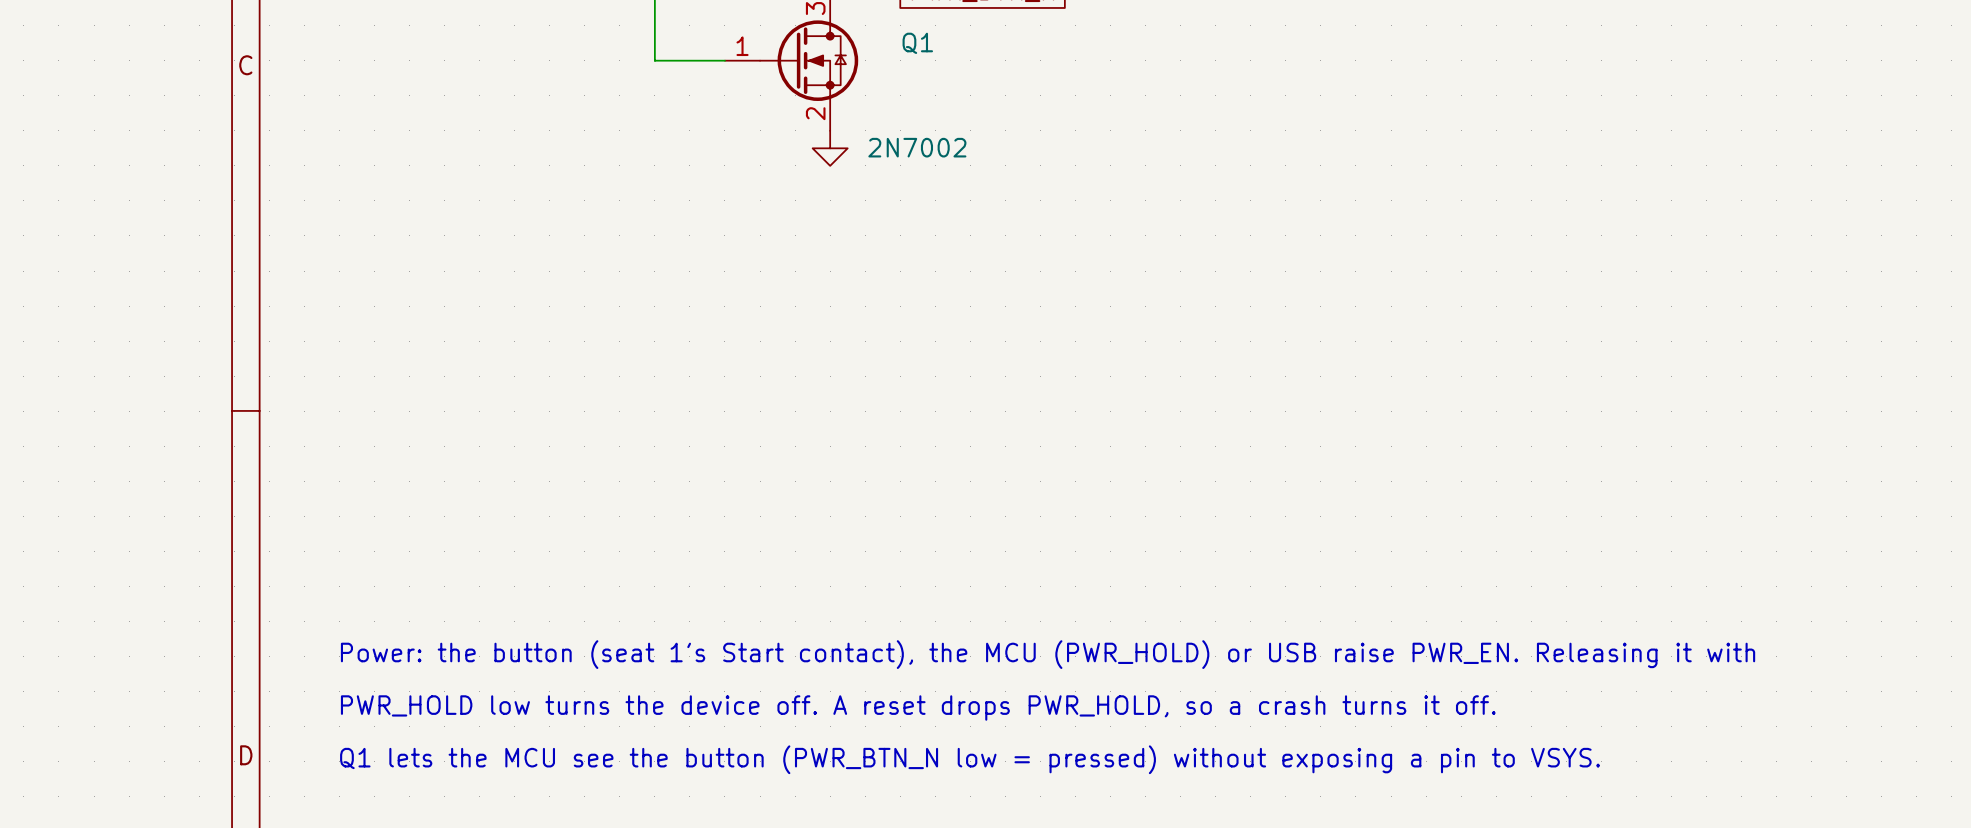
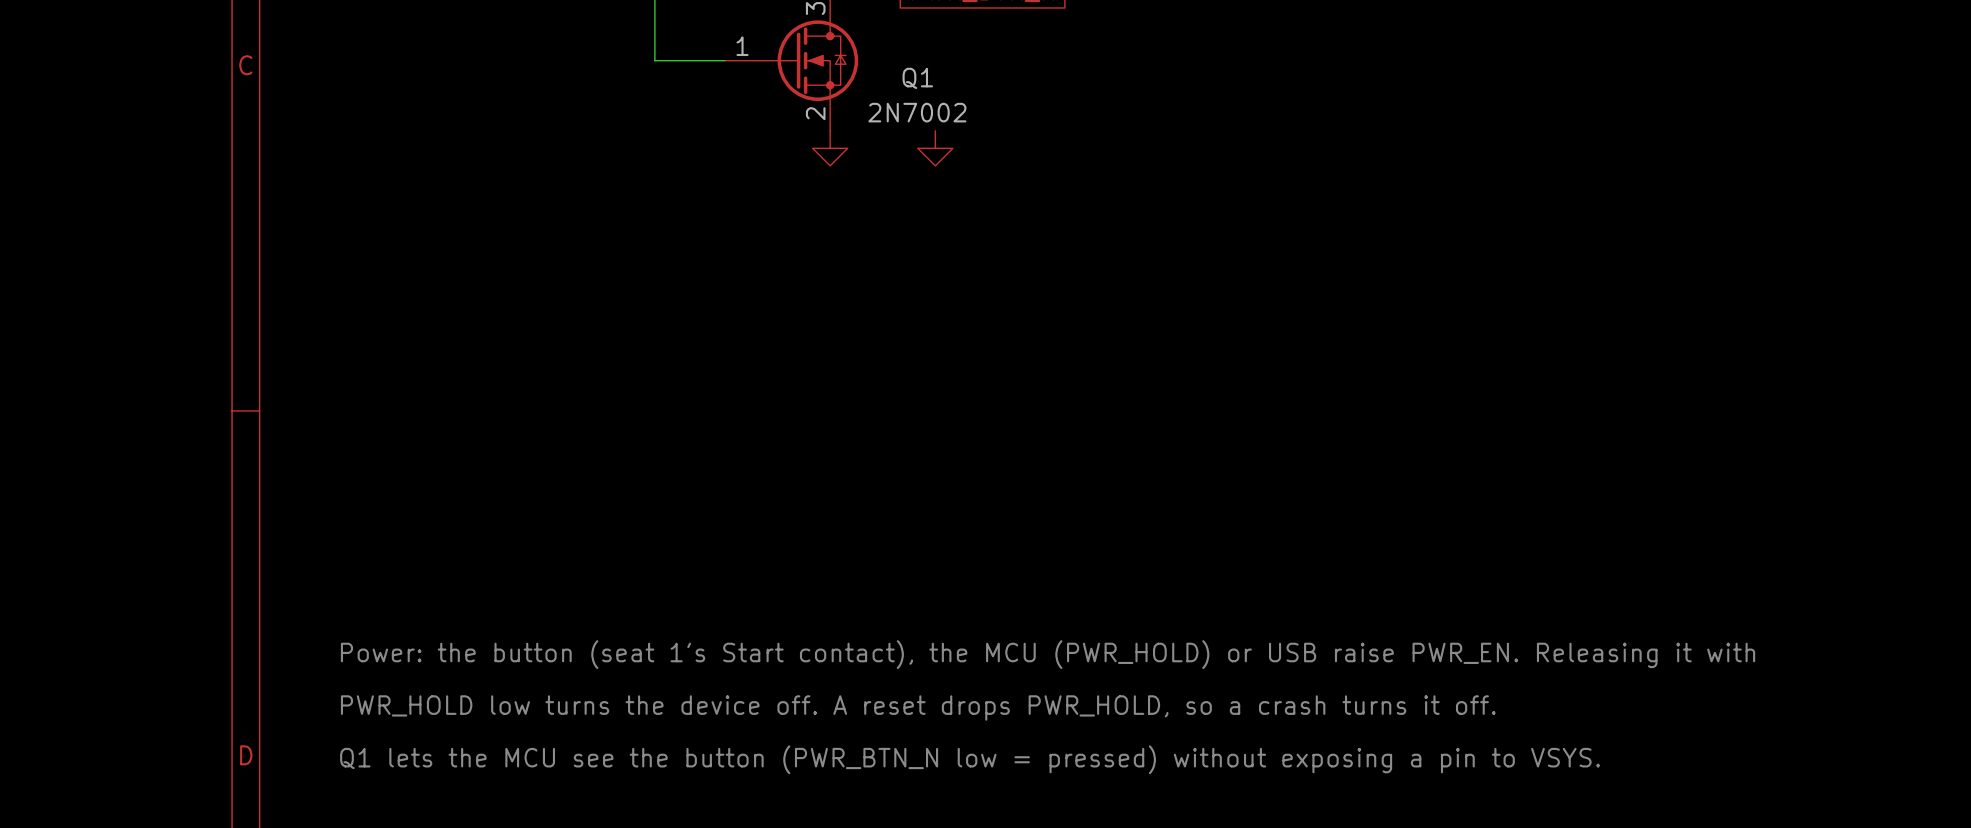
Q1 name position: Q1 (917, 43) -> Q1 (917, 78)
Q1 value position: 2N7002 (917, 147) -> 2N7002 (917, 112)
power symbol: none -> (935, 148)

